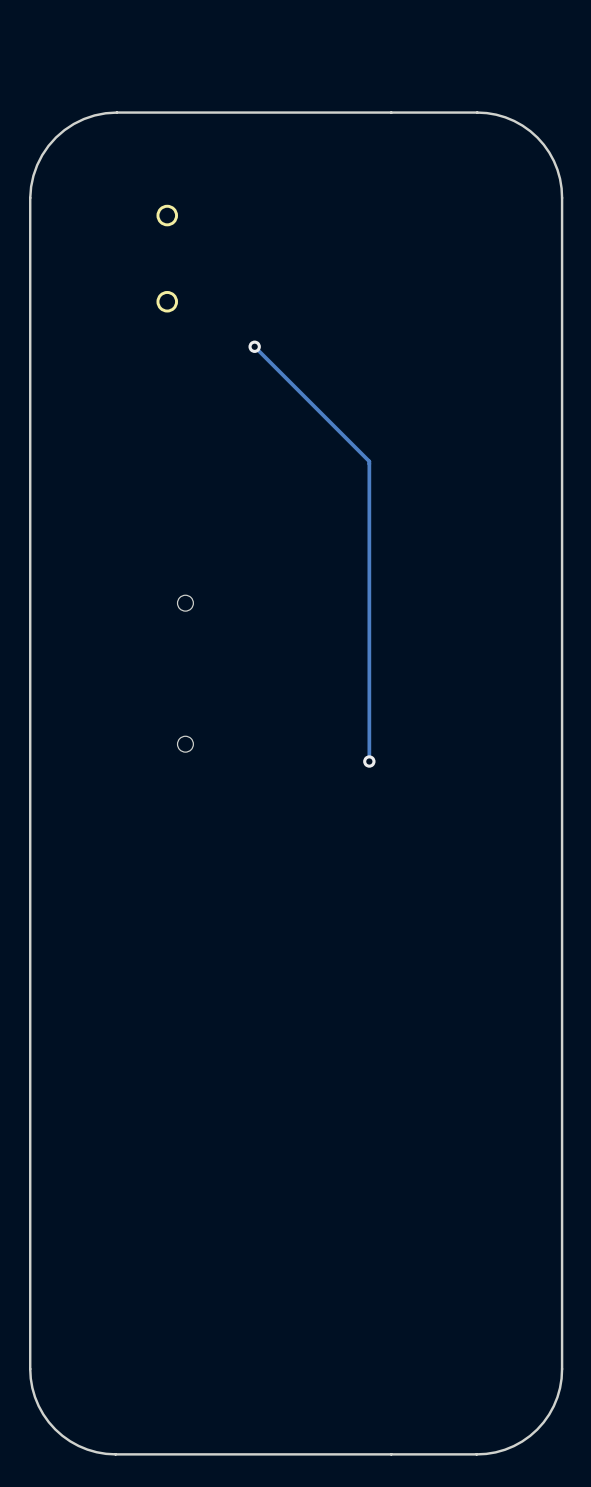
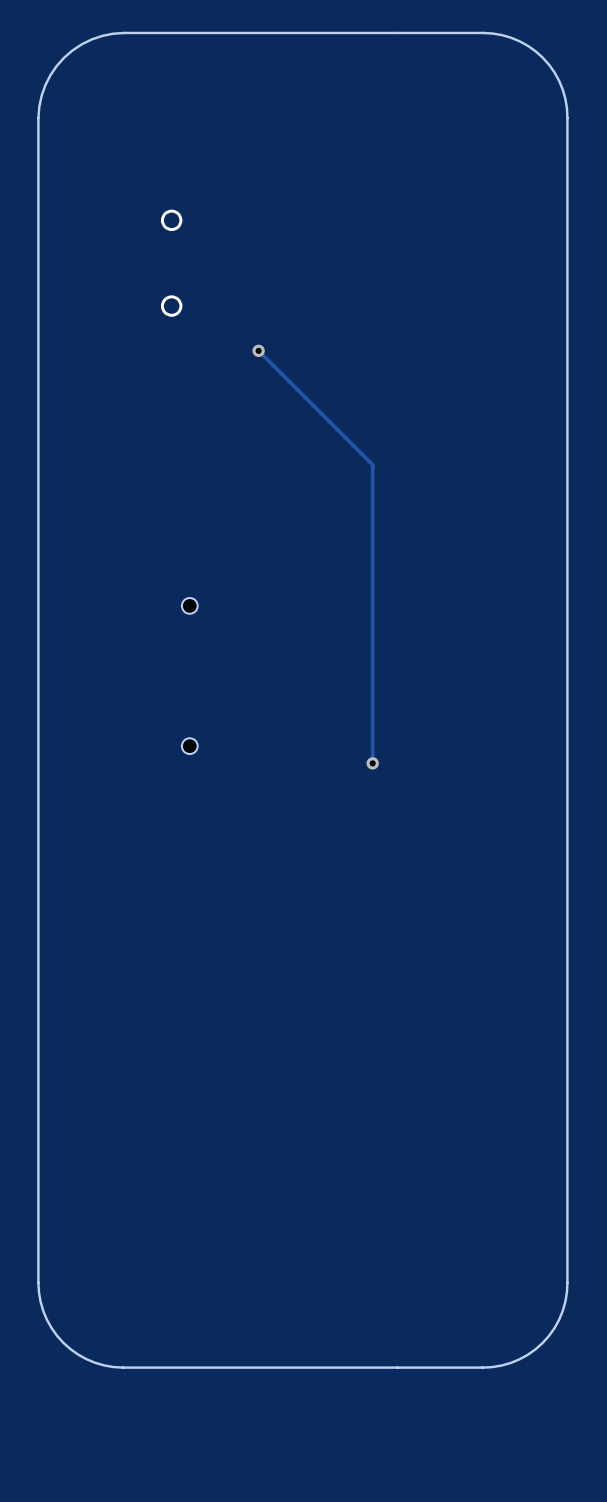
board edge: (477, 112) (105, 113) (83, 119) (56, 137) (42, 155) (33, 175) (30, 197) (30, 1368) (35, 1397) (48, 1422) (70, 1441) (96, 1452) (115, 1454) (486, 1453) (513, 1446) (530, 1435) (543, 1422) (557, 1397) (562, 1368) (561, 188) (557, 169) (549, 152) (530, 131) (505, 117) (477, 112) -> (483, 32) (113, 33) (91, 39) (64, 57) (50, 75) (41, 95) (38, 117) (38, 1282) (43, 1310) (56, 1335) (78, 1354) (104, 1365) (123, 1367) (492, 1367) (510, 1362) (535, 1349) (549, 1335) (562, 1310) (567, 1282) (566, 108) (559, 81) (549, 64) (535, 51) (511, 37) (483, 32)

